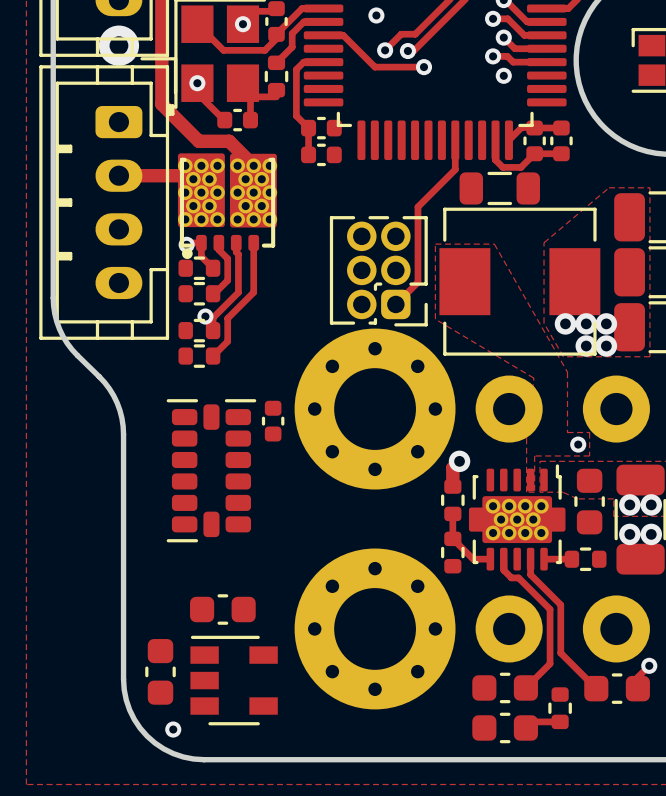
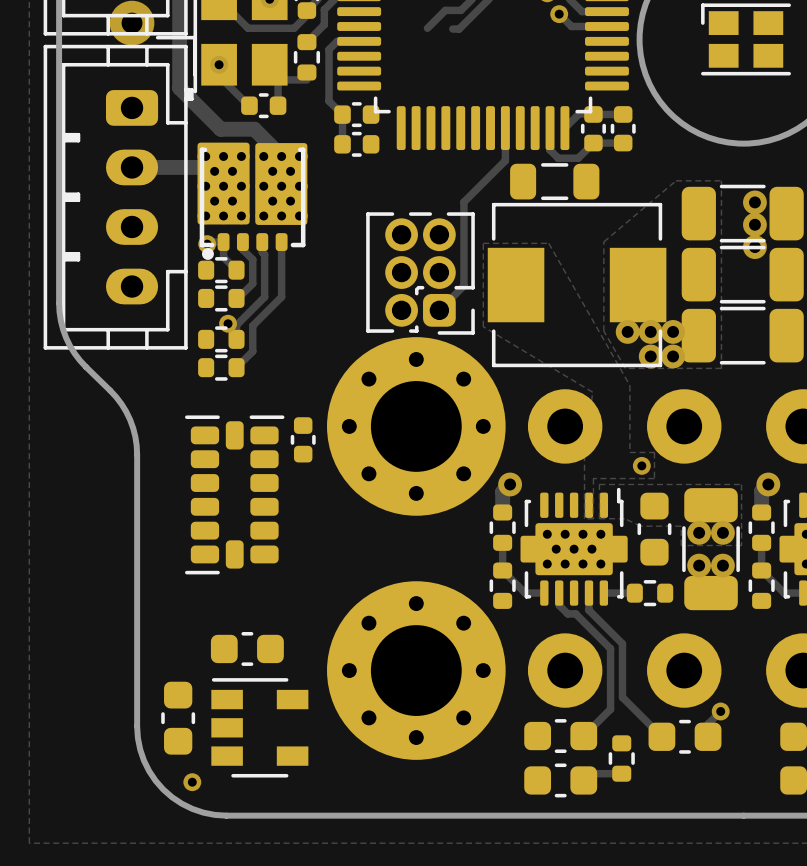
track: (323, 35) (343, 35) (374, 67) (424, 67) -> none
via: (385, 50) -> none
via: (407, 51) -> none
track: (493, 56) (507, 56) (513, 62) (546, 62) -> none
via: (493, 56) -> none
via: (424, 67) -> none
via: (503, 75) -> none

